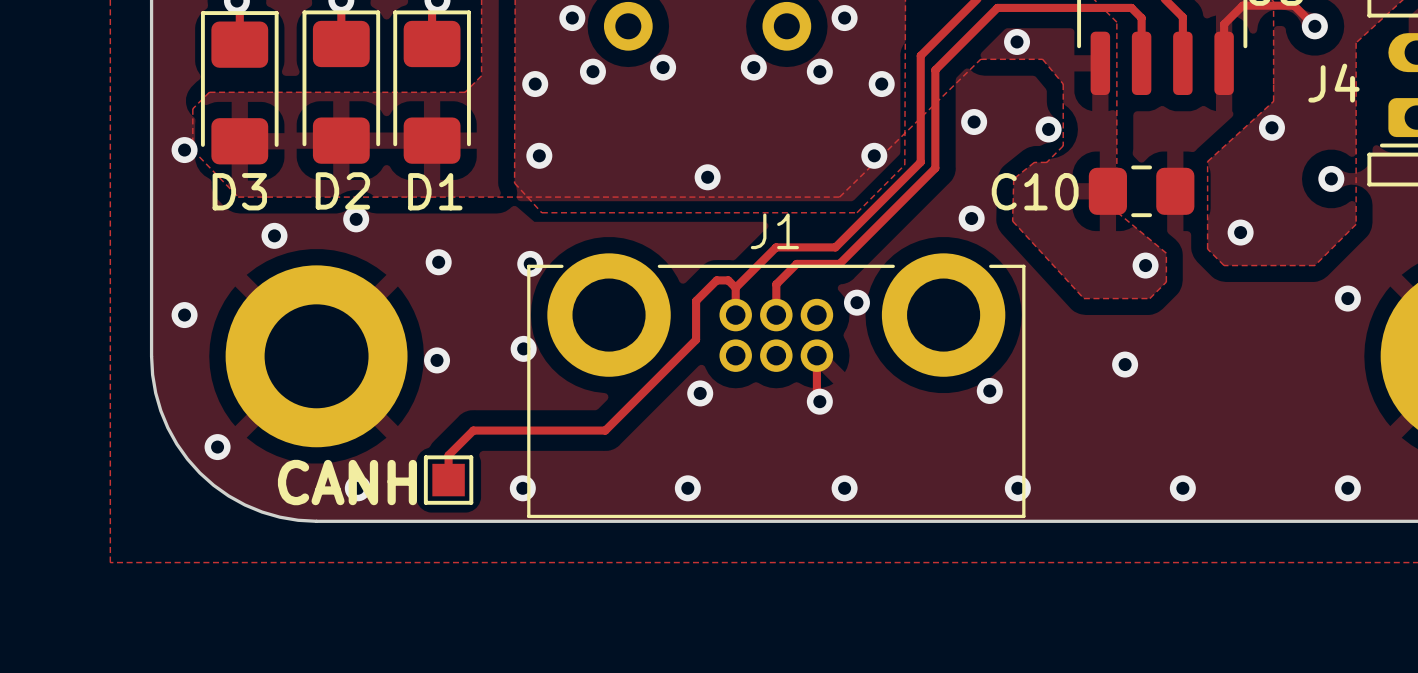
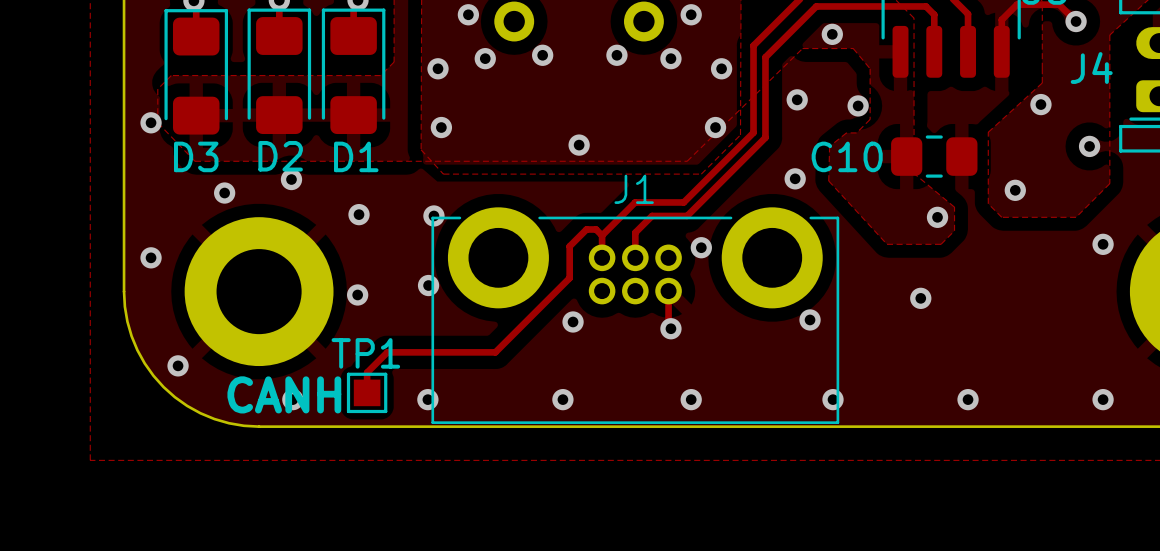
TP1 name: none -> TP1 (365, 353)

